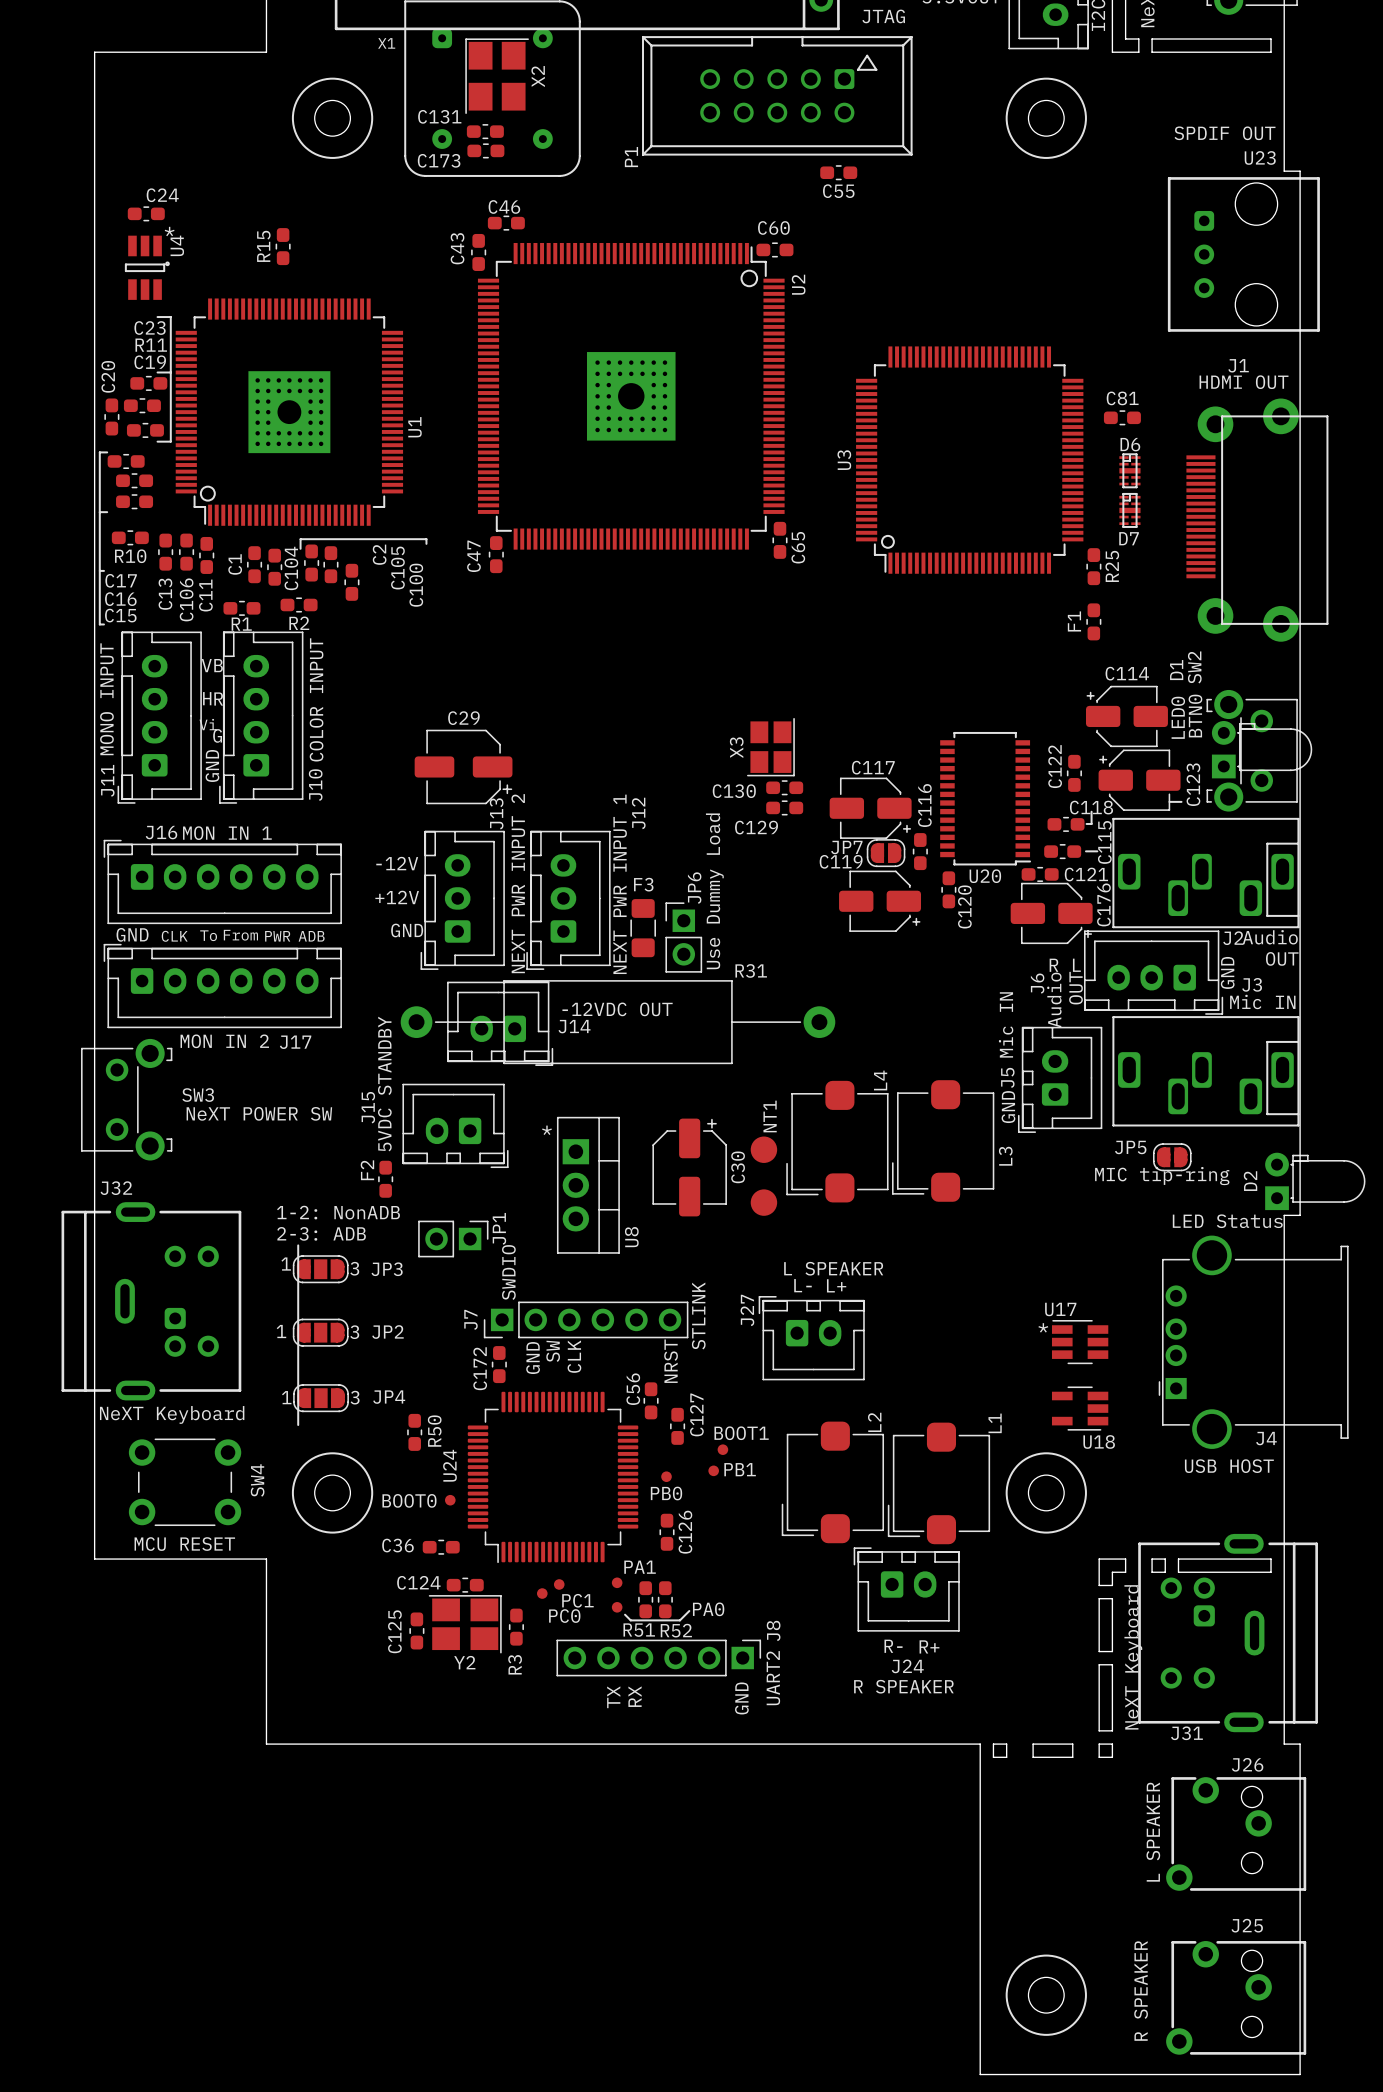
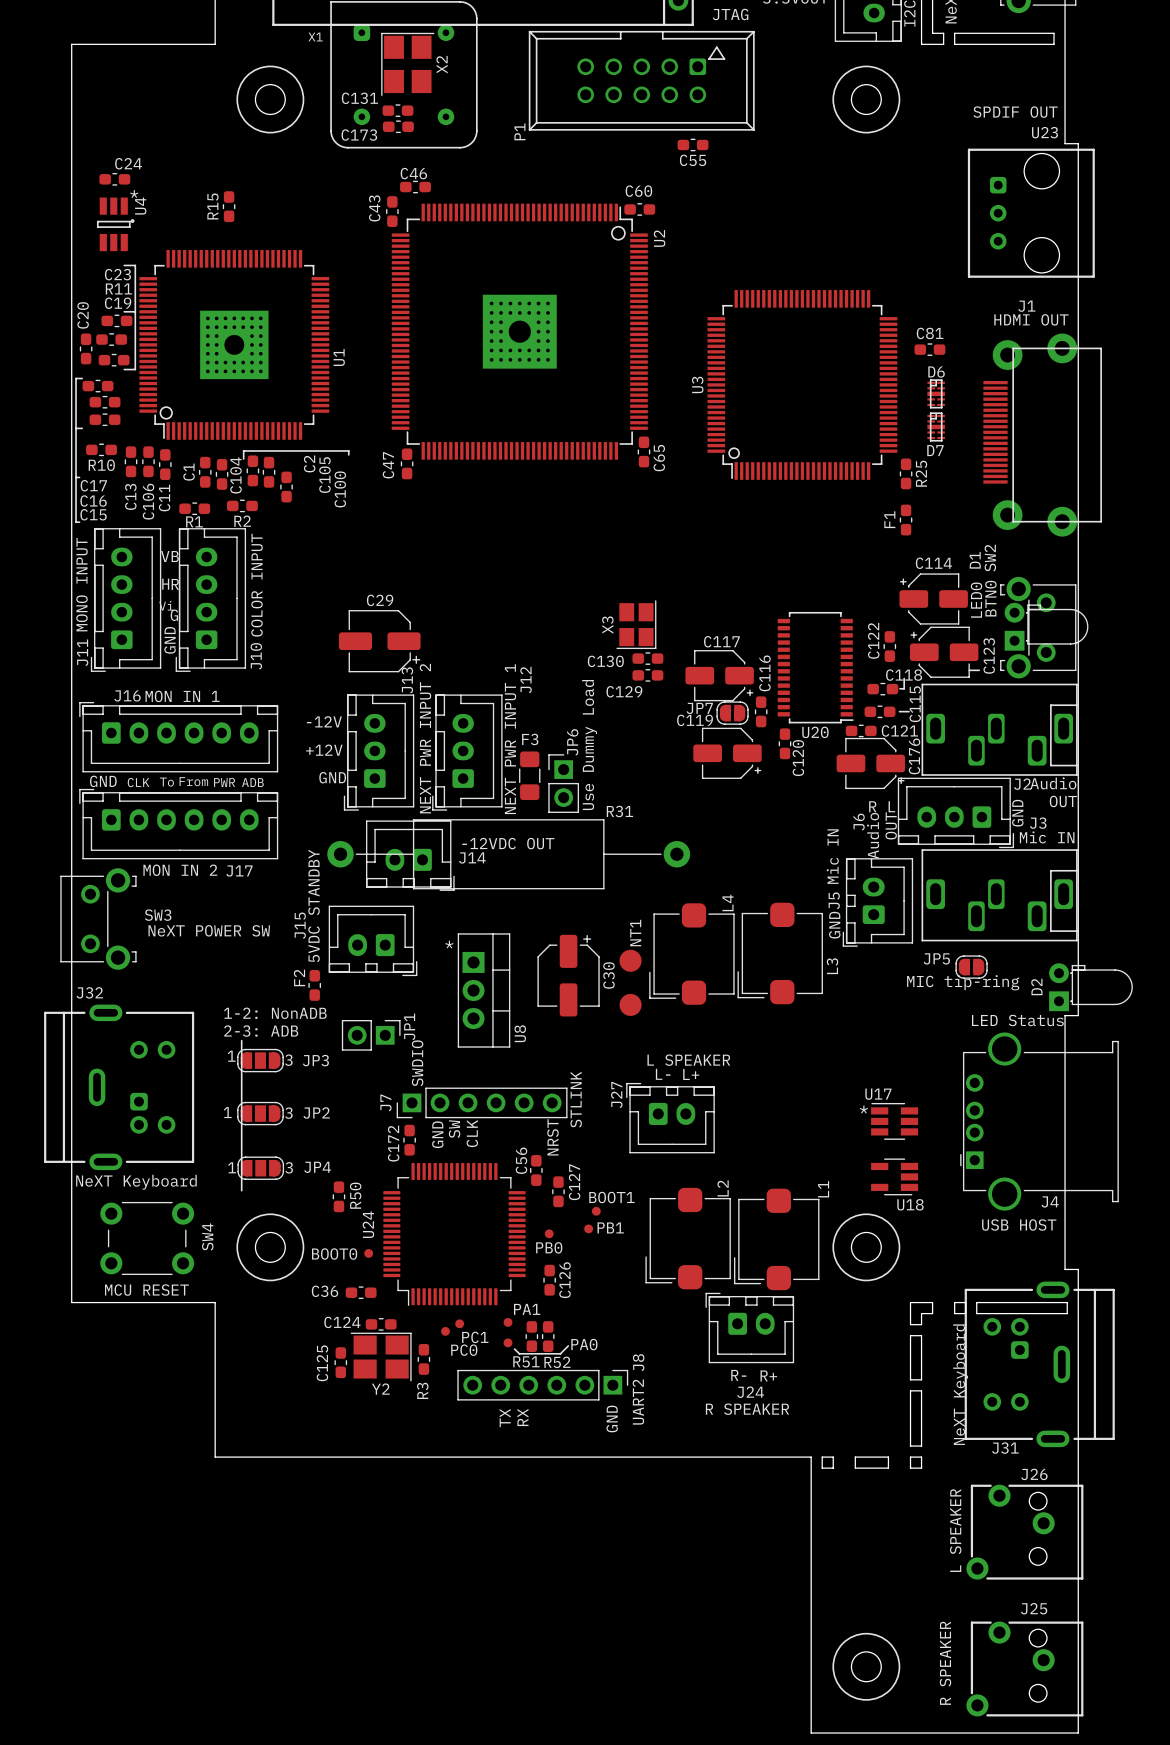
board edge: (1284, 1519) (1284, 1744) (1300, 1744) -> (1065, 1269) (1078, 1269) (1078, 1457)
board edge: (1271, 1559) (1271, 1572) -> (1053, 1302) (1067, 1302) (1067, 1313) (1053, 1313)
J31 position: (1228, 1633) -> (1039, 1364)

